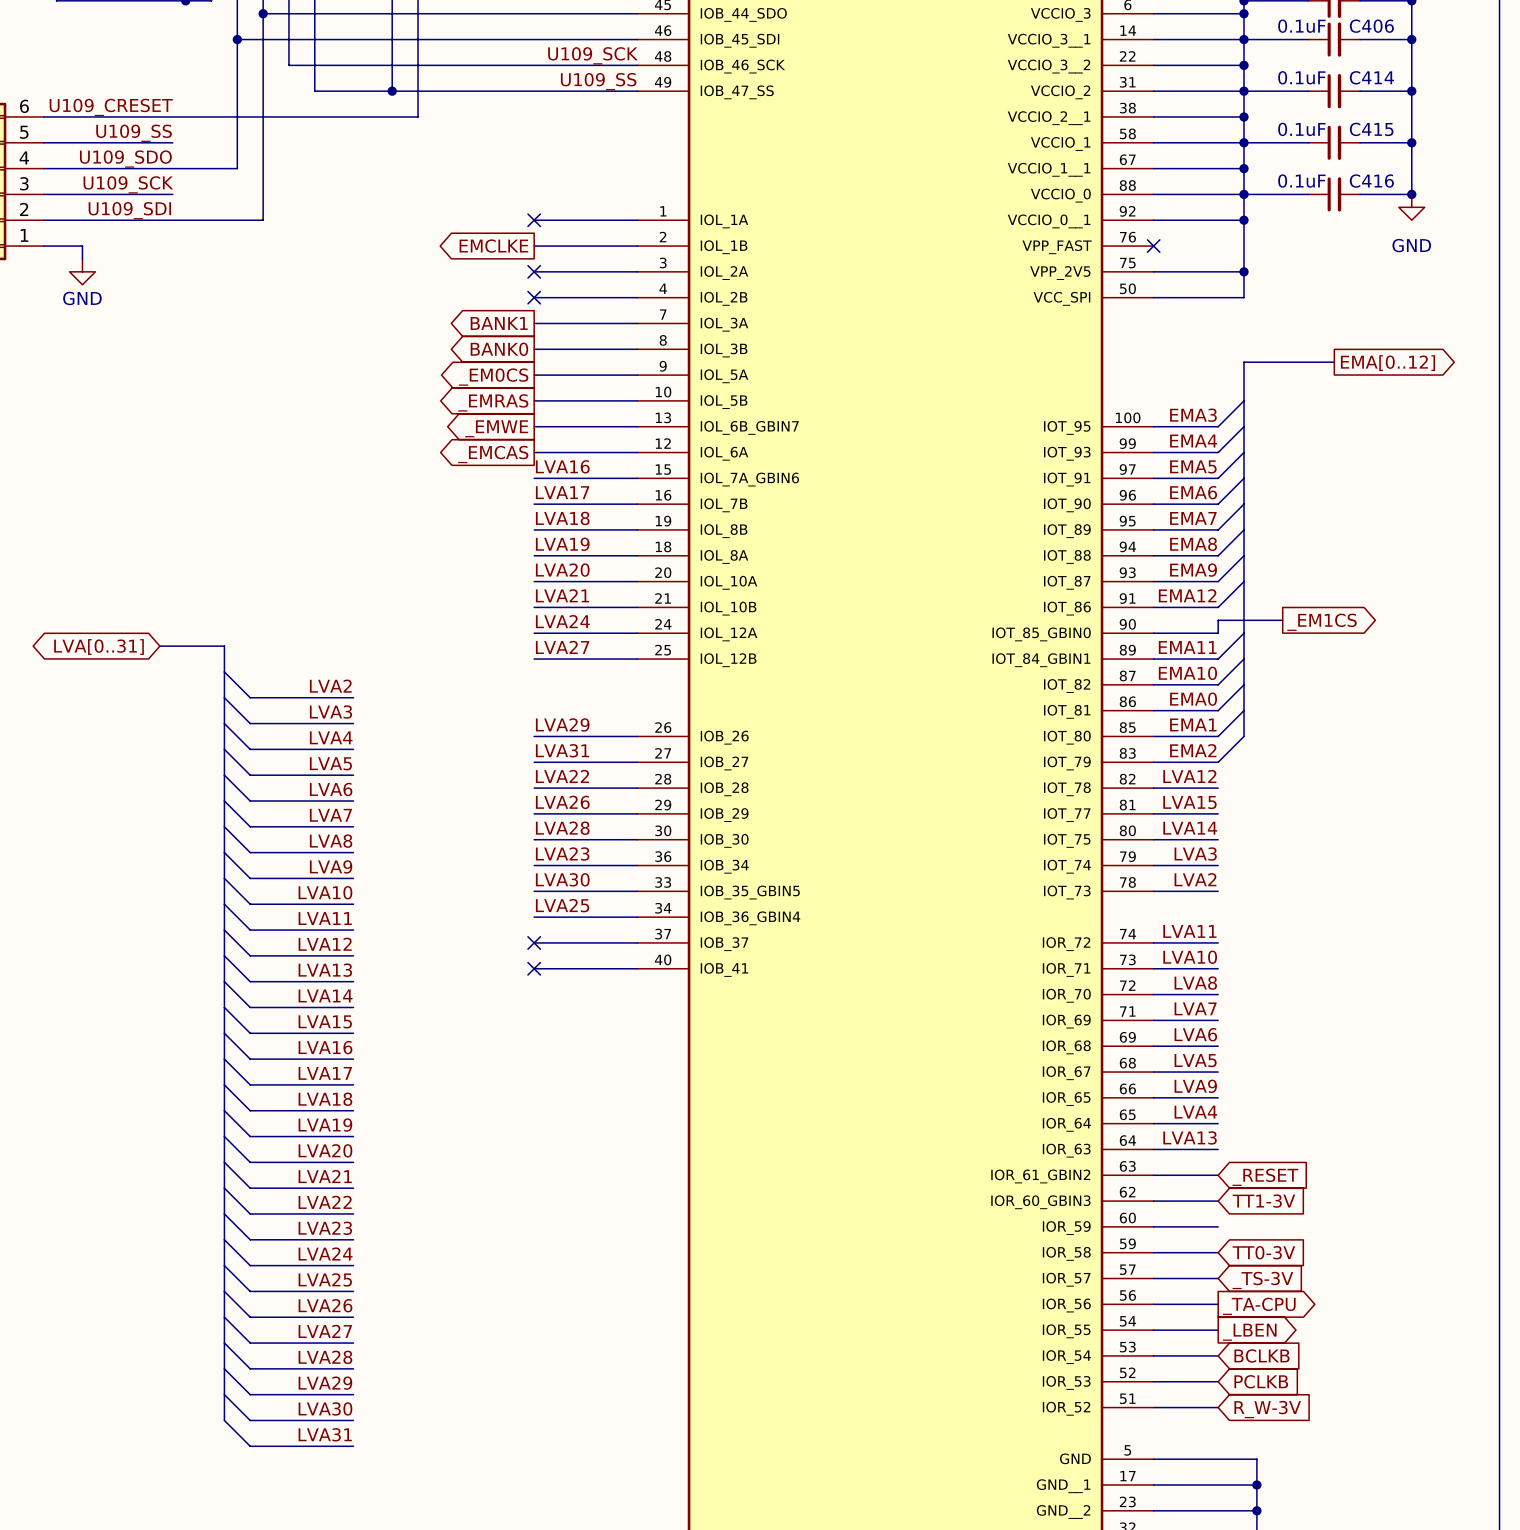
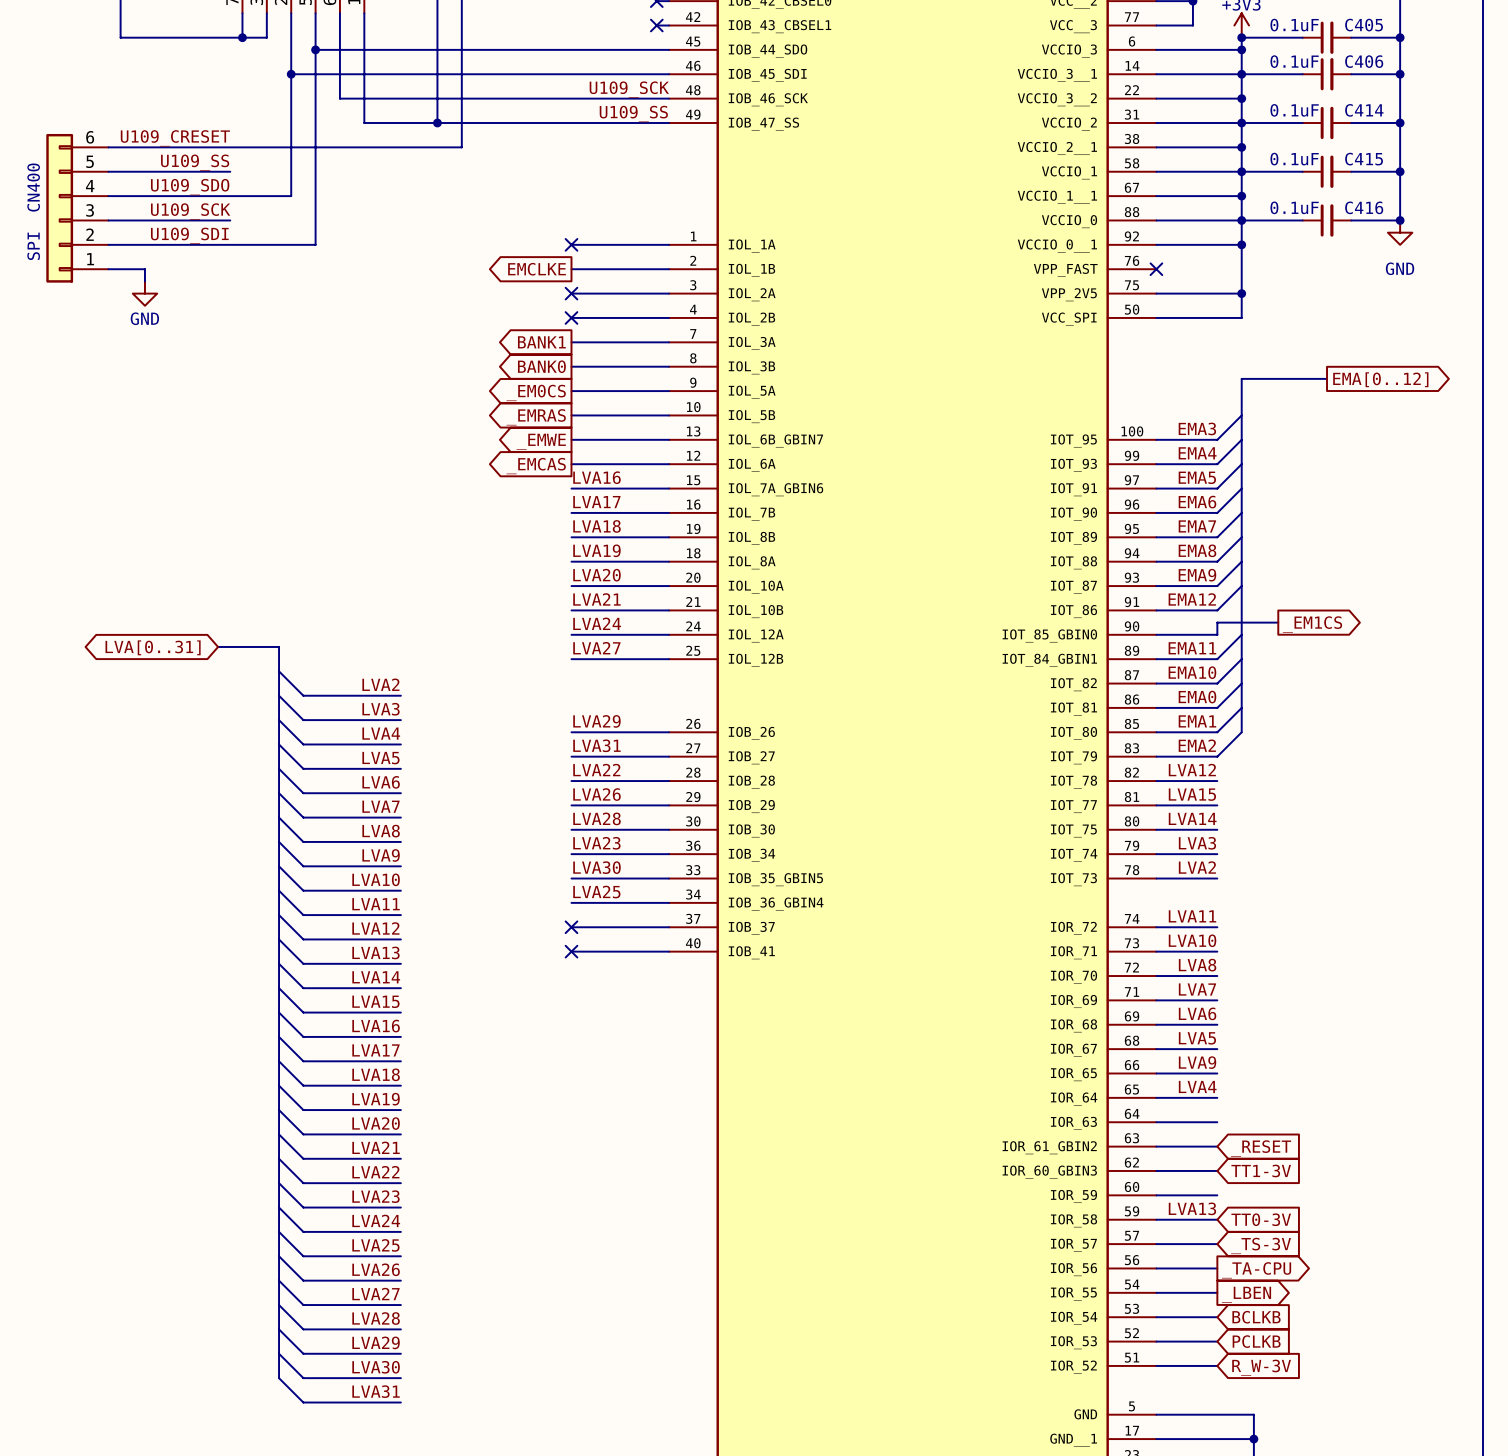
label position: LVA13 (1190, 1137) -> LVA13 (1192, 1208)

